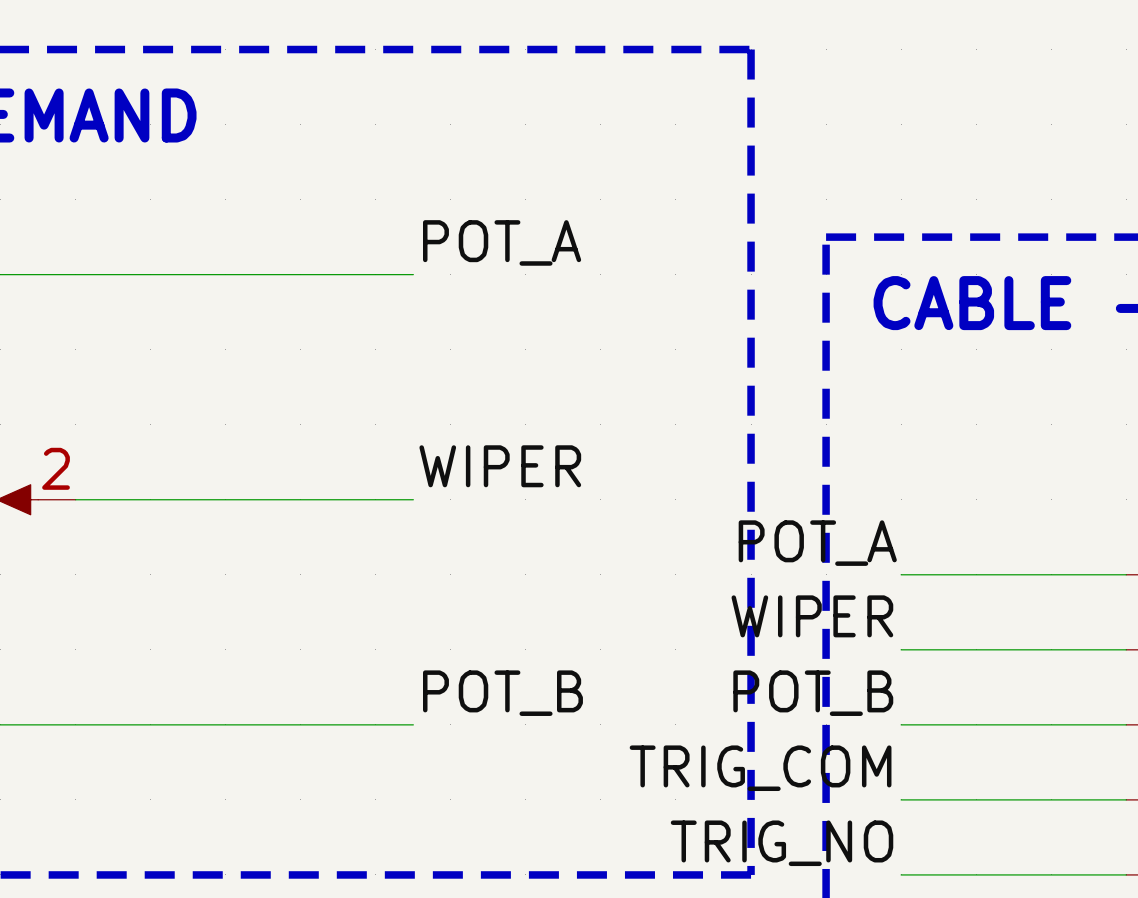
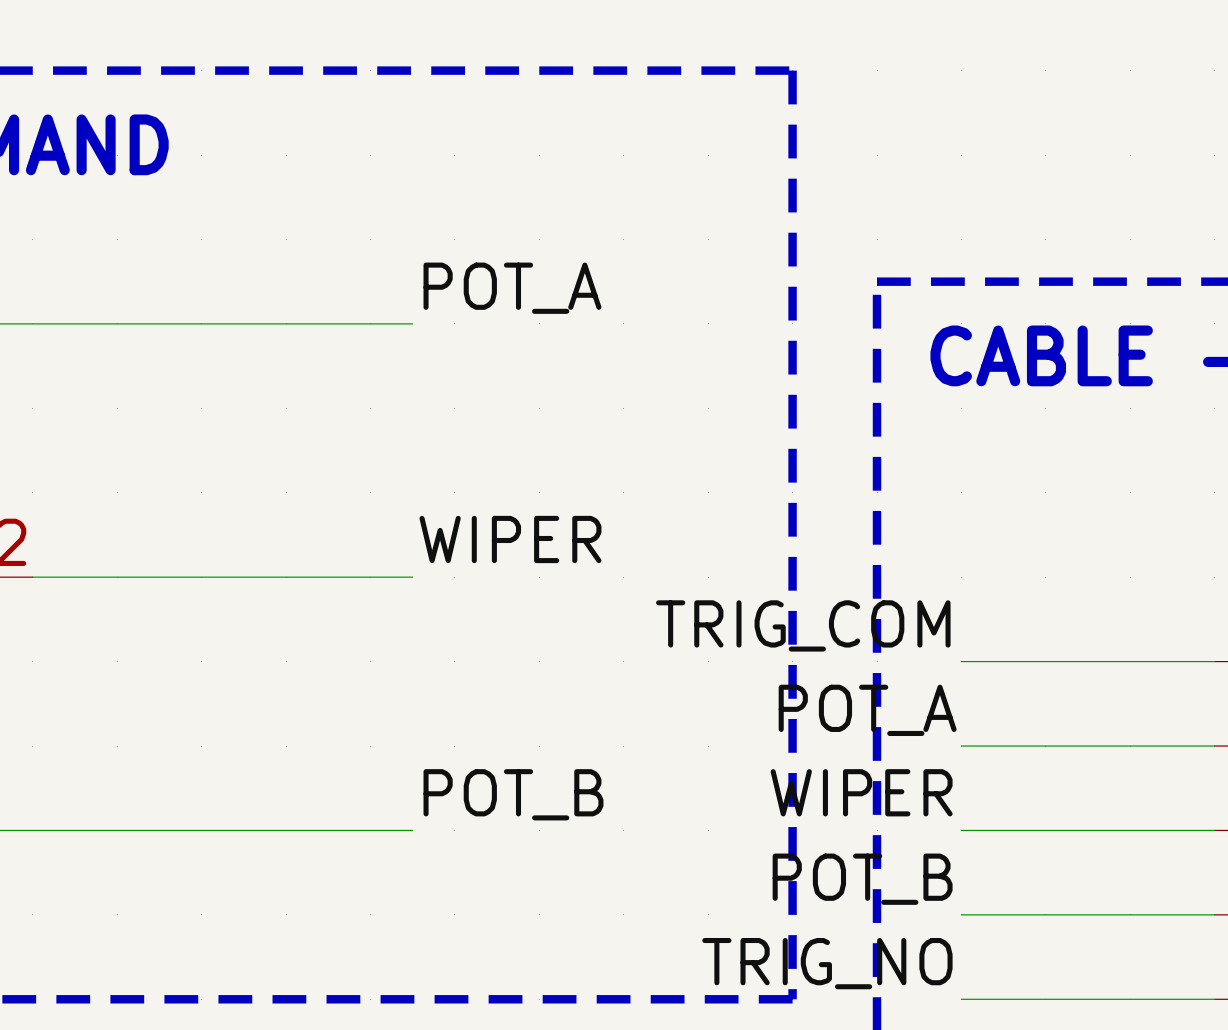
label: POT_A (817, 543) -> TRIG_COM (803, 625)
label: WIPER (812, 616) -> POT_A (867, 710)
label: POT_B (813, 693) -> WIPER (861, 792)
label: TRIG_COM (760, 768) -> POT_B (862, 879)

